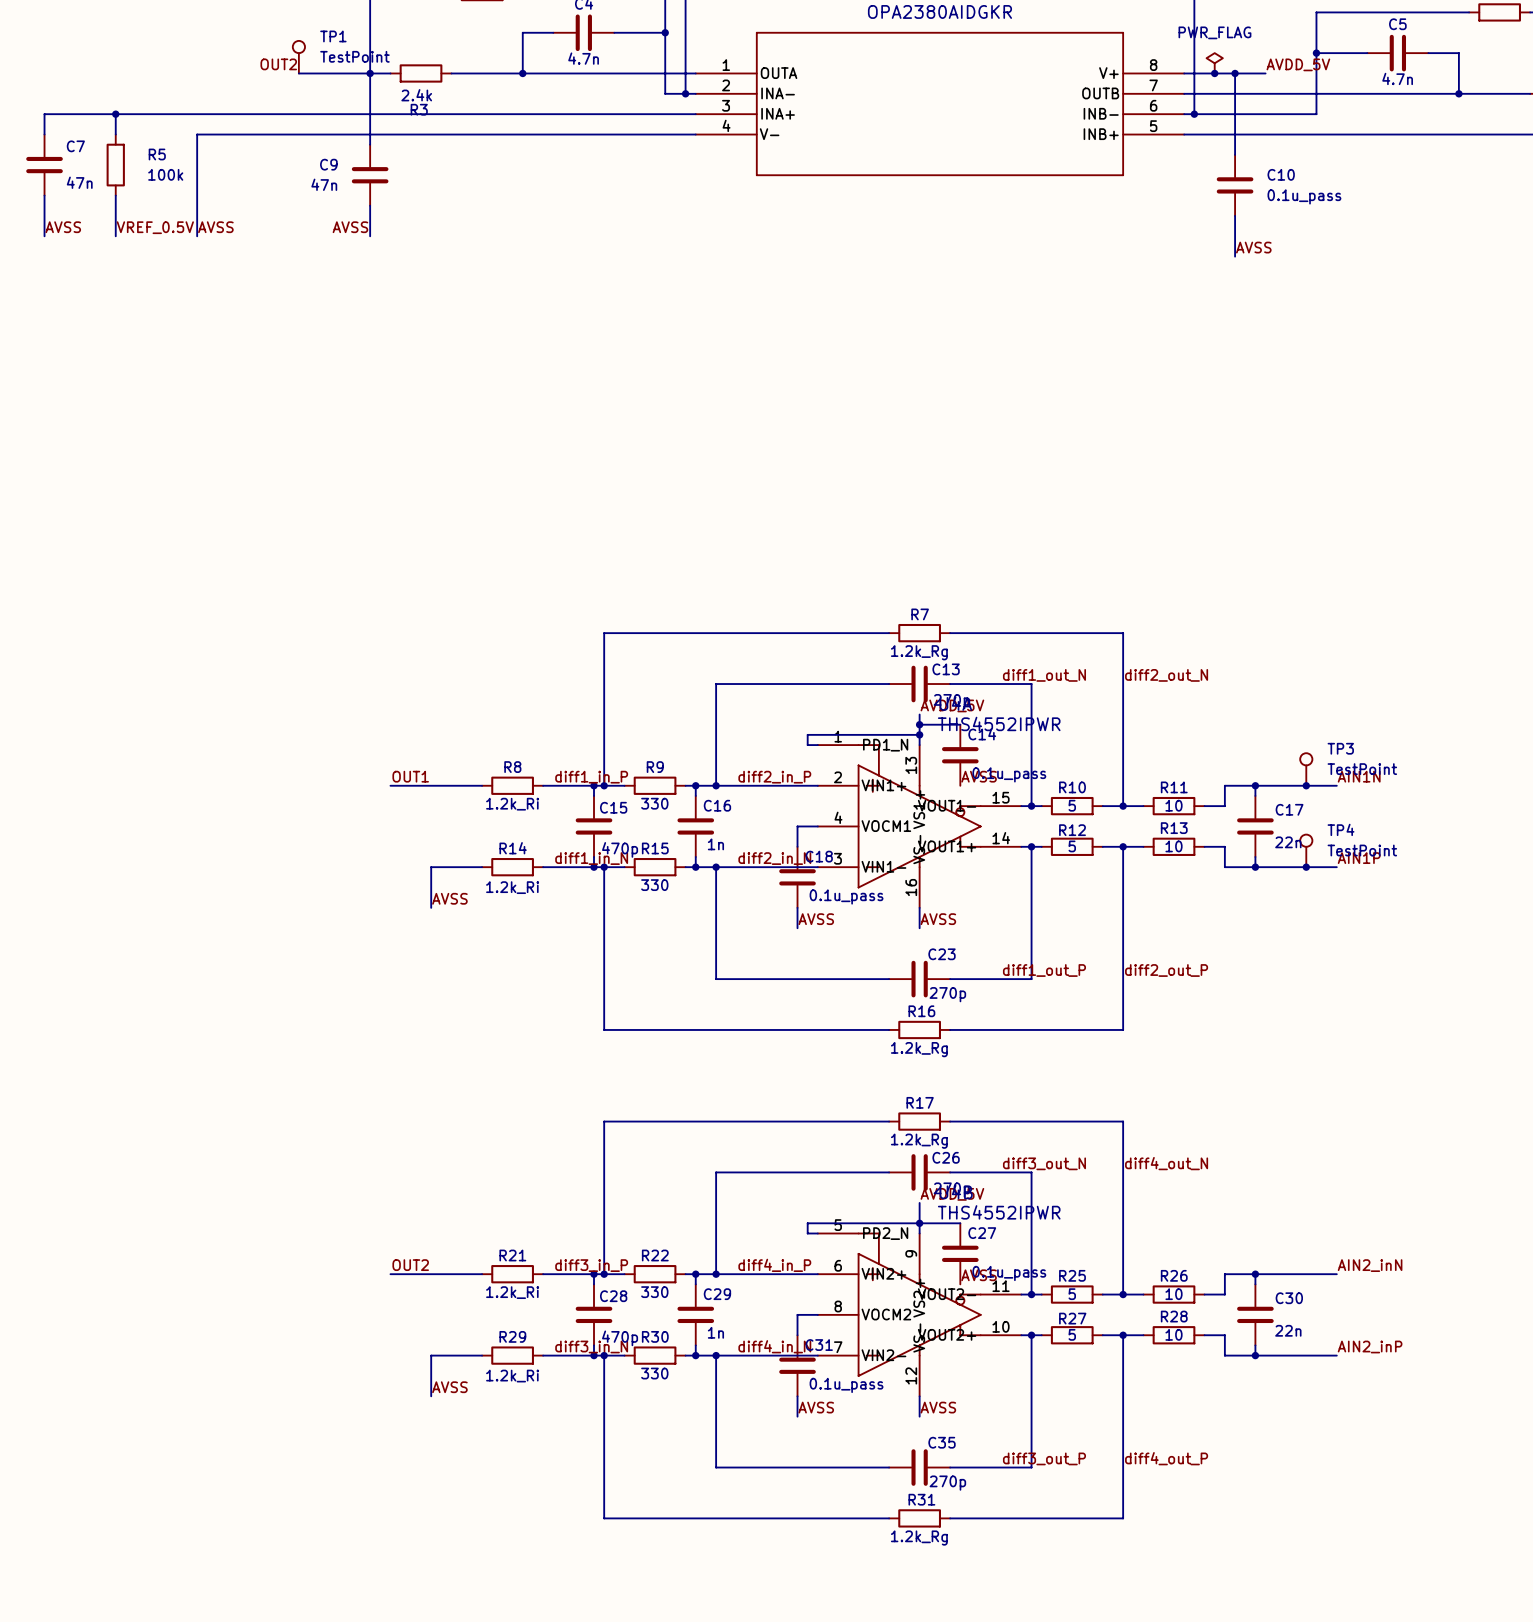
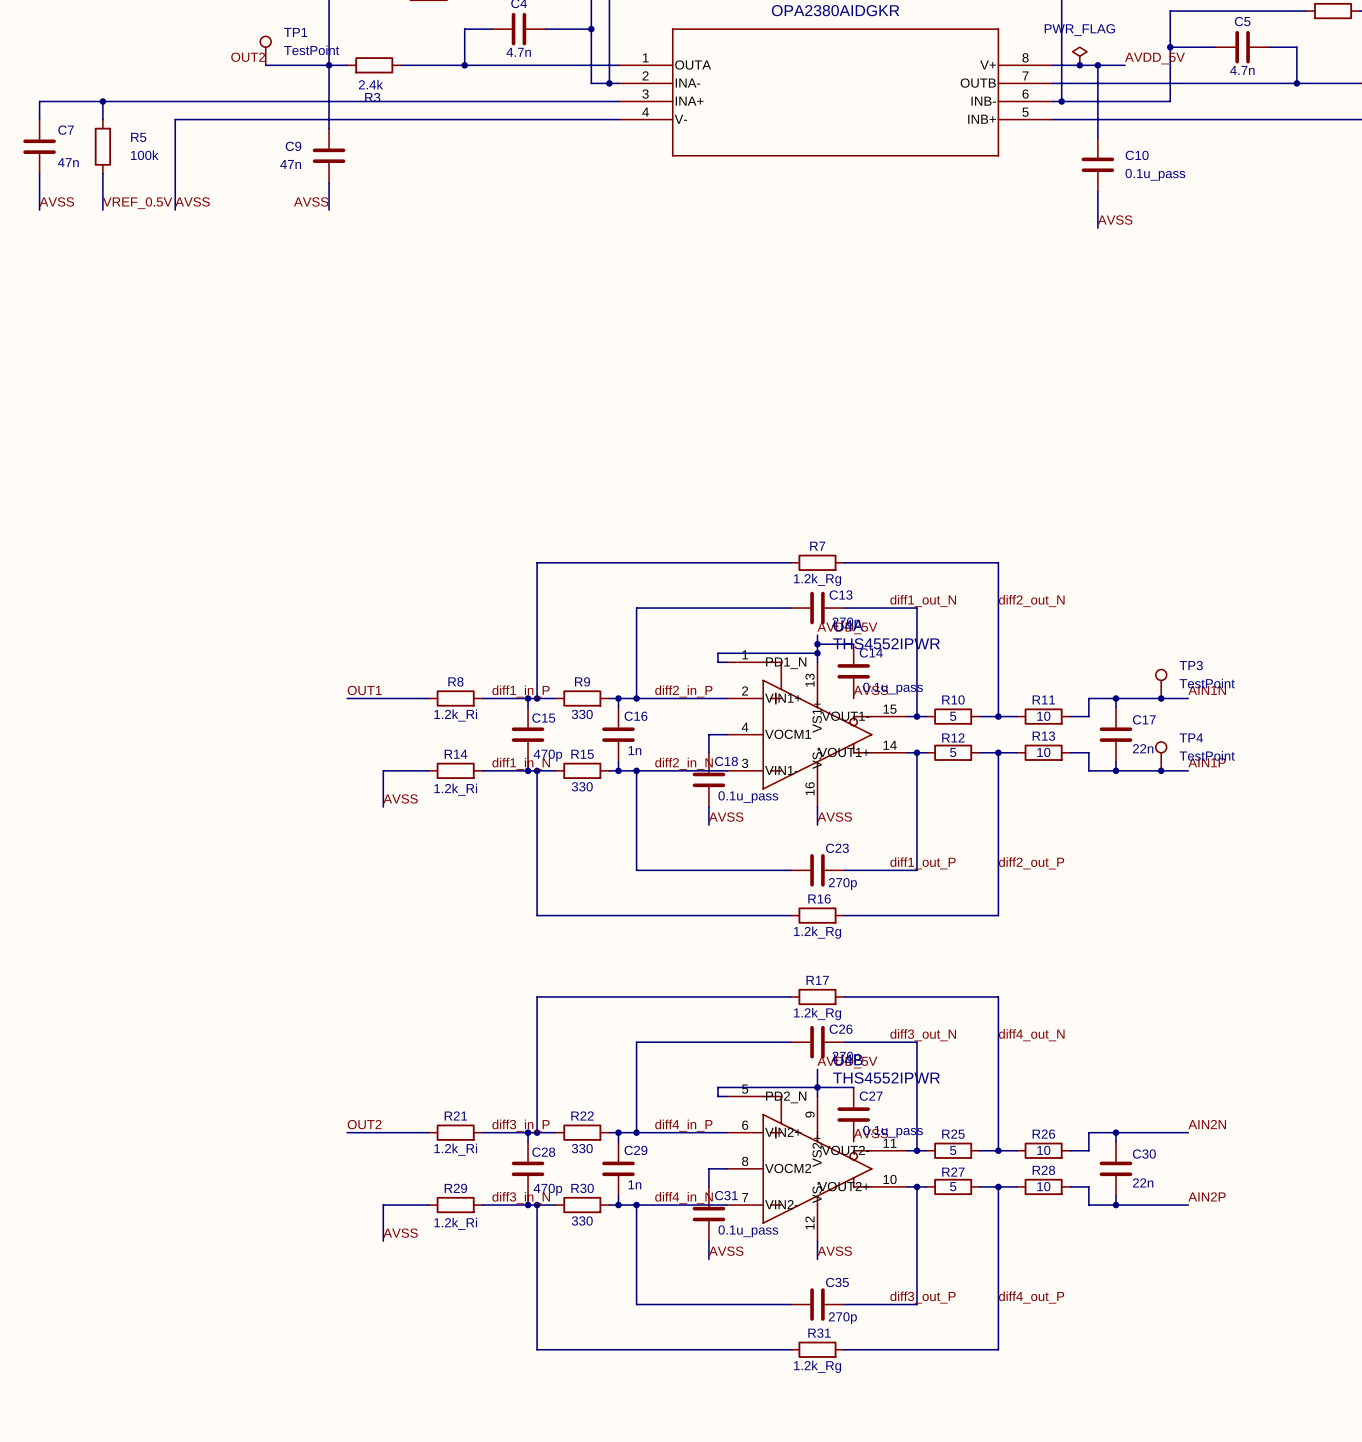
label: AIN2_inN (1370, 1265) -> AIN2N (1207, 1124)
label: AIN2_inP (1370, 1347) -> AIN2P (1207, 1196)

